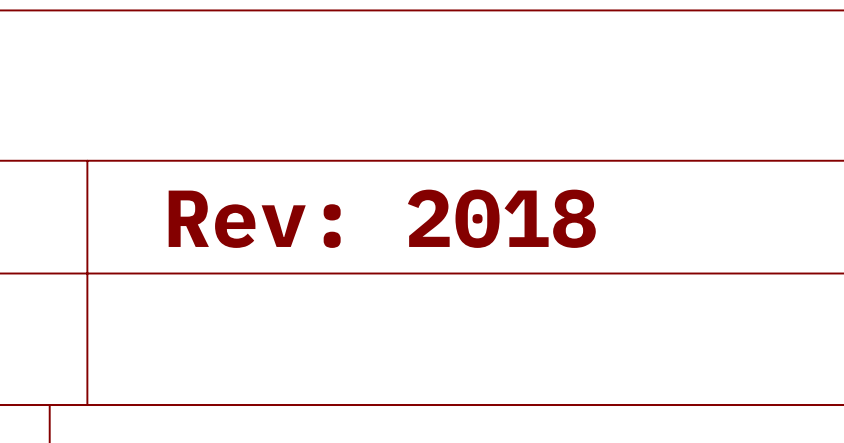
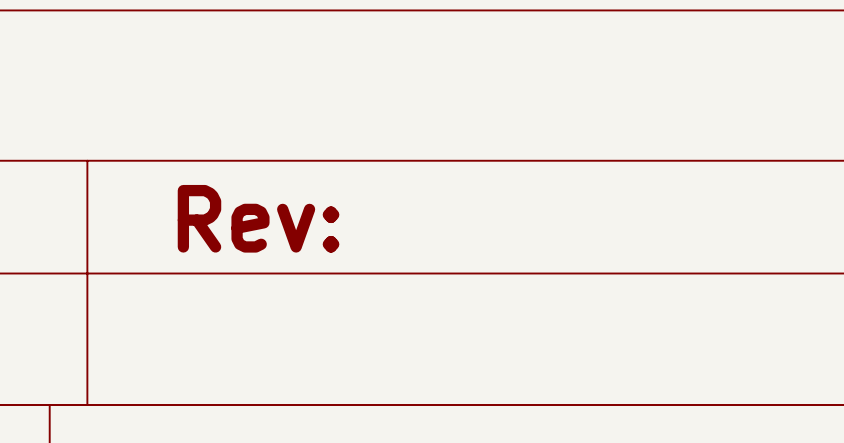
title block: Rev: 2018 (382, 218) -> Rev: (258, 218)

